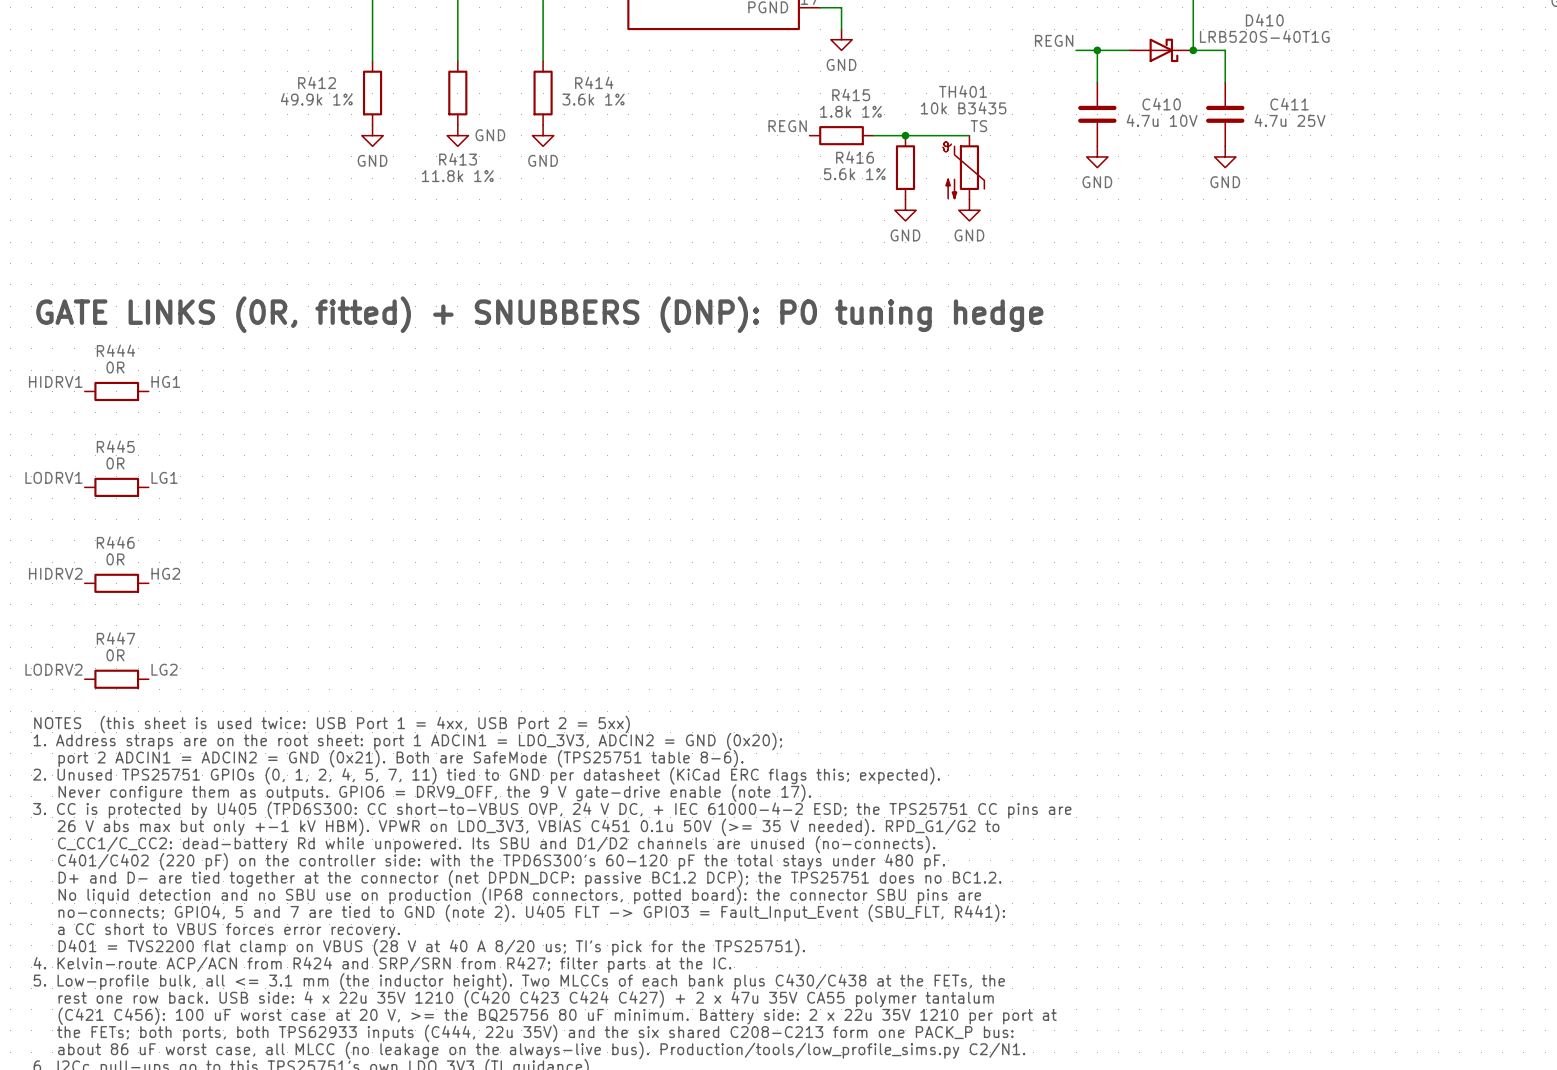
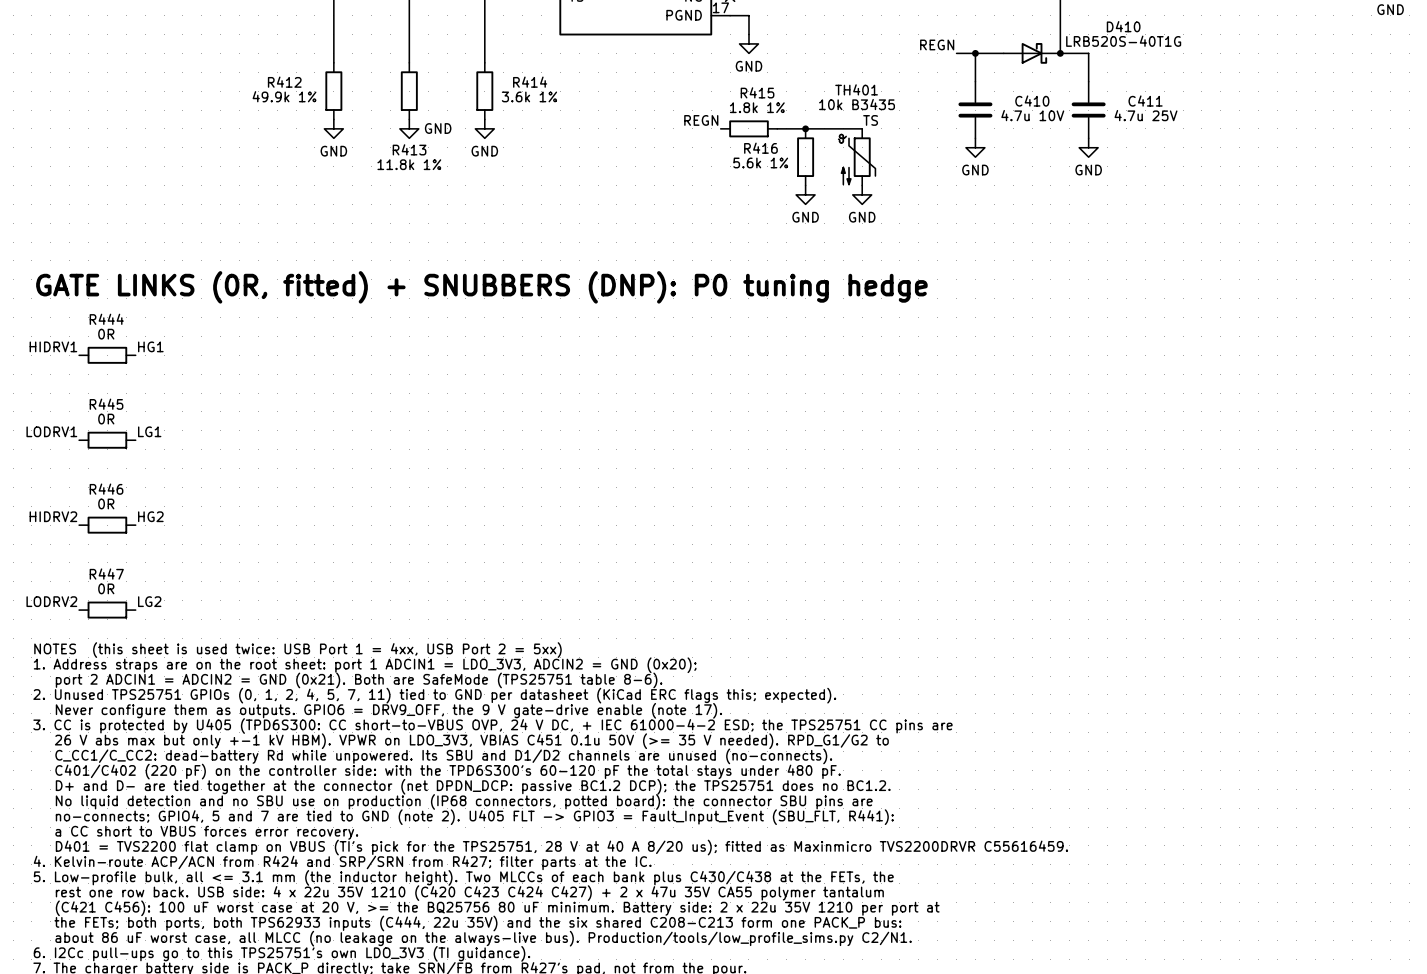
text: D401 = TVS2200 flat clamp on VBUS (28 V at 40 A 8/20 us; TI's pick for the TPS25751). (431, 947) -> D401 = TVS2200 flat clamp on VBUS (TI's pick for the TPS25751, 28 V at 40 A 8/20 us); fitted as Maxinmicro TVS2200DRVR C55616459. (561, 847)

